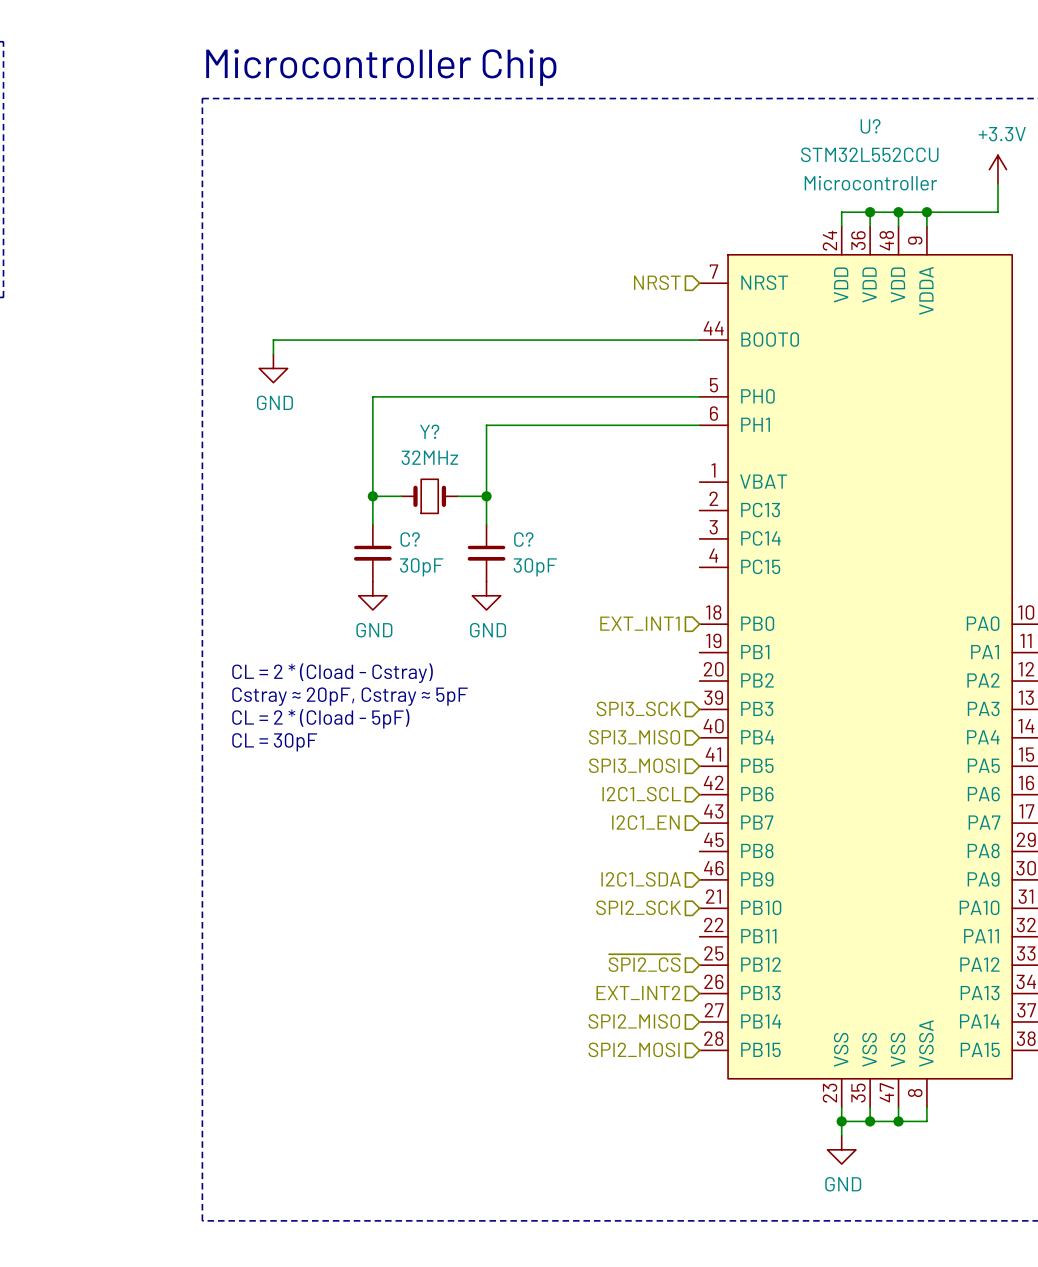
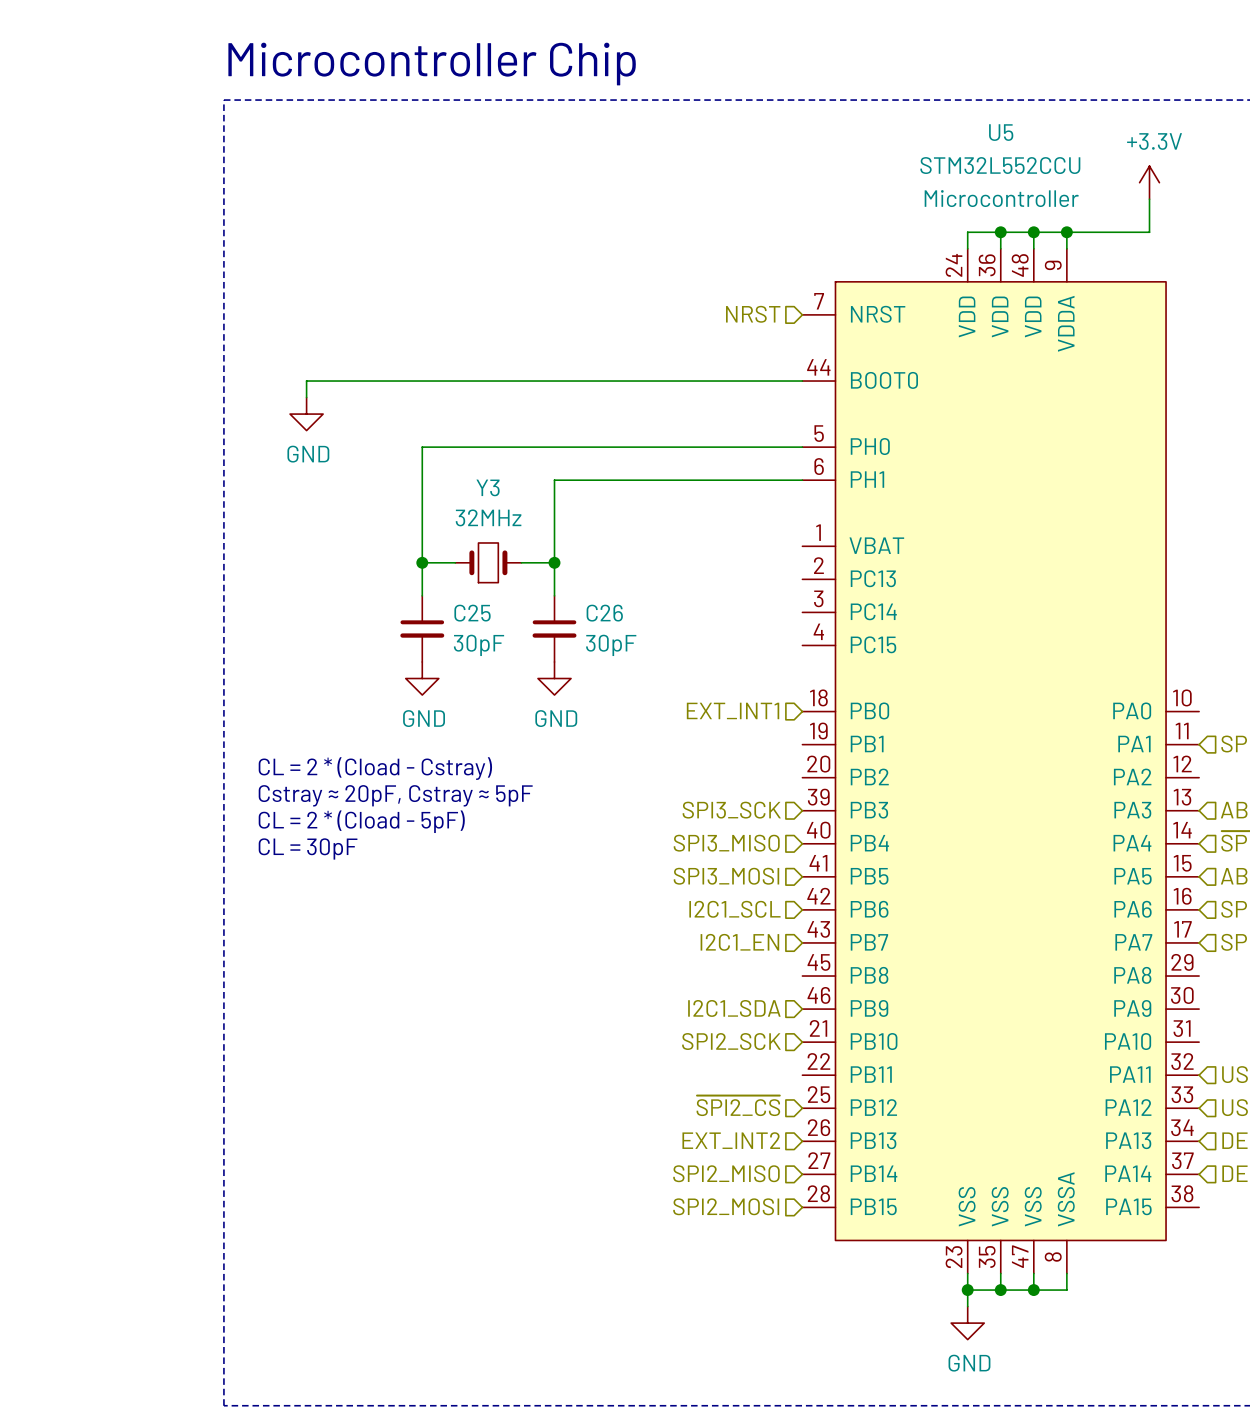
U? name: U? (870, 126) -> U5 (1001, 132)
Y? name: Y? (429, 431) -> Y3 (488, 487)
C? name: C? (410, 539) -> C25 (472, 613)
C? name: C? (523, 539) -> C26 (604, 613)

